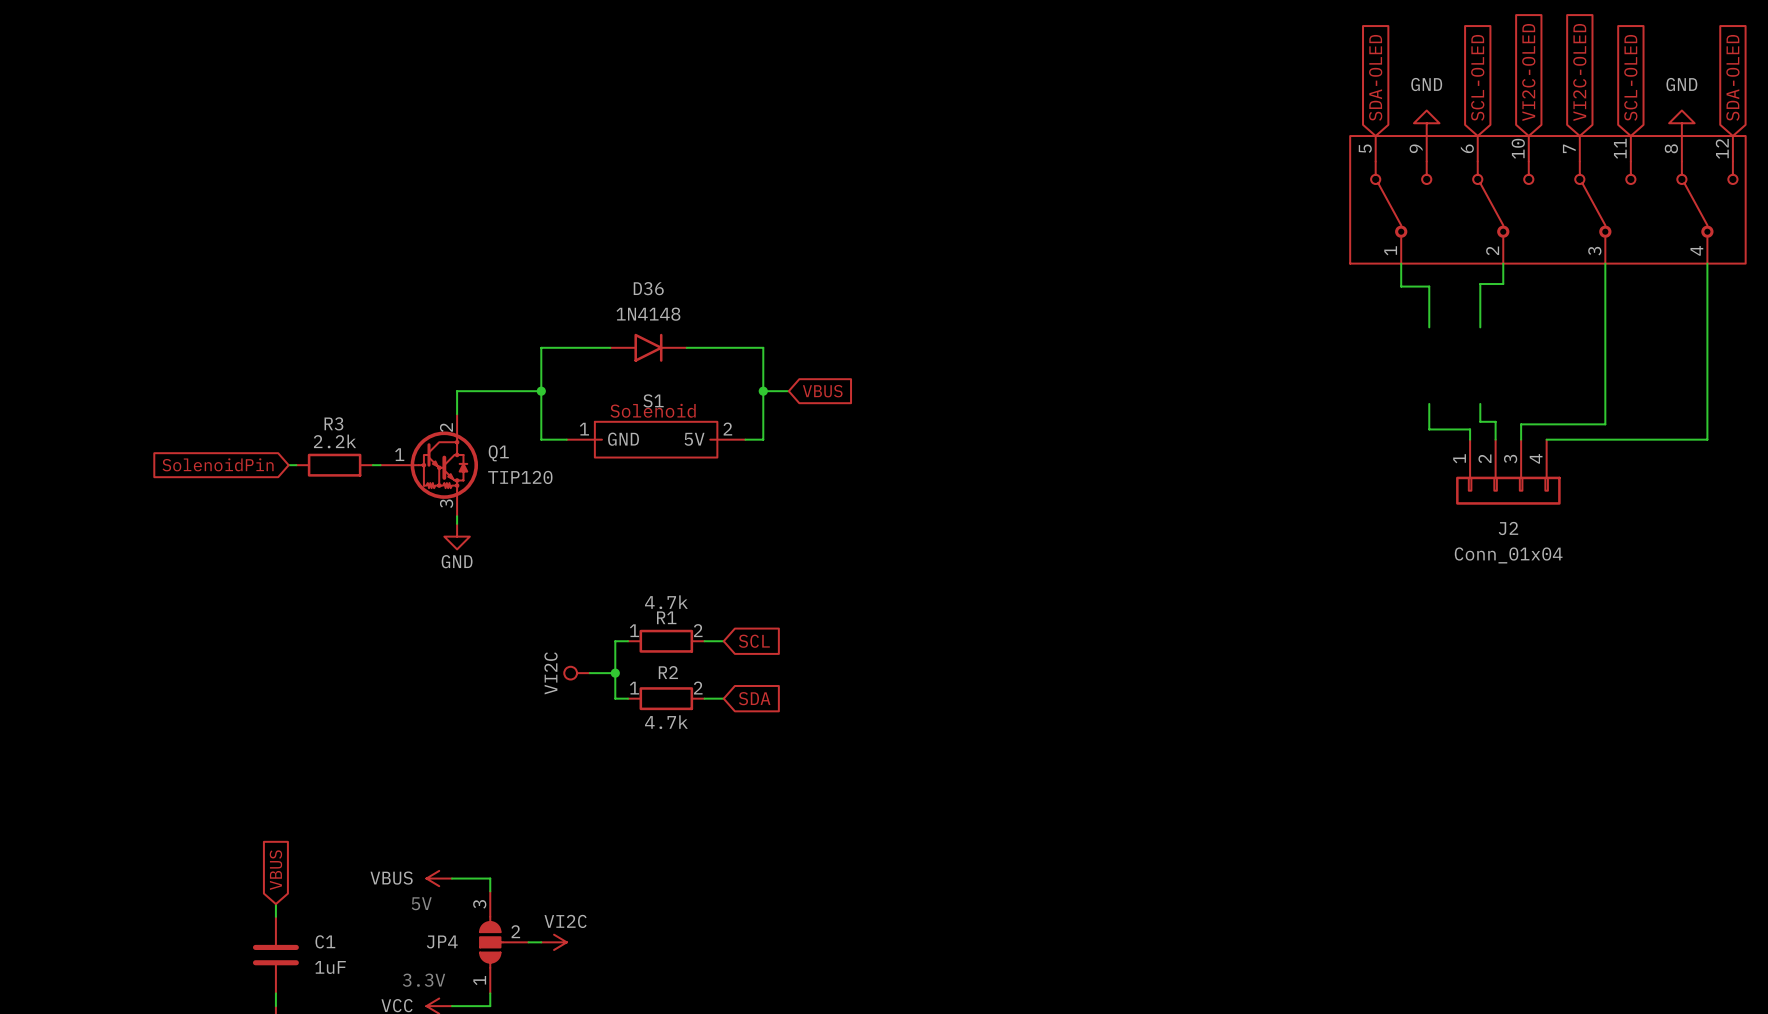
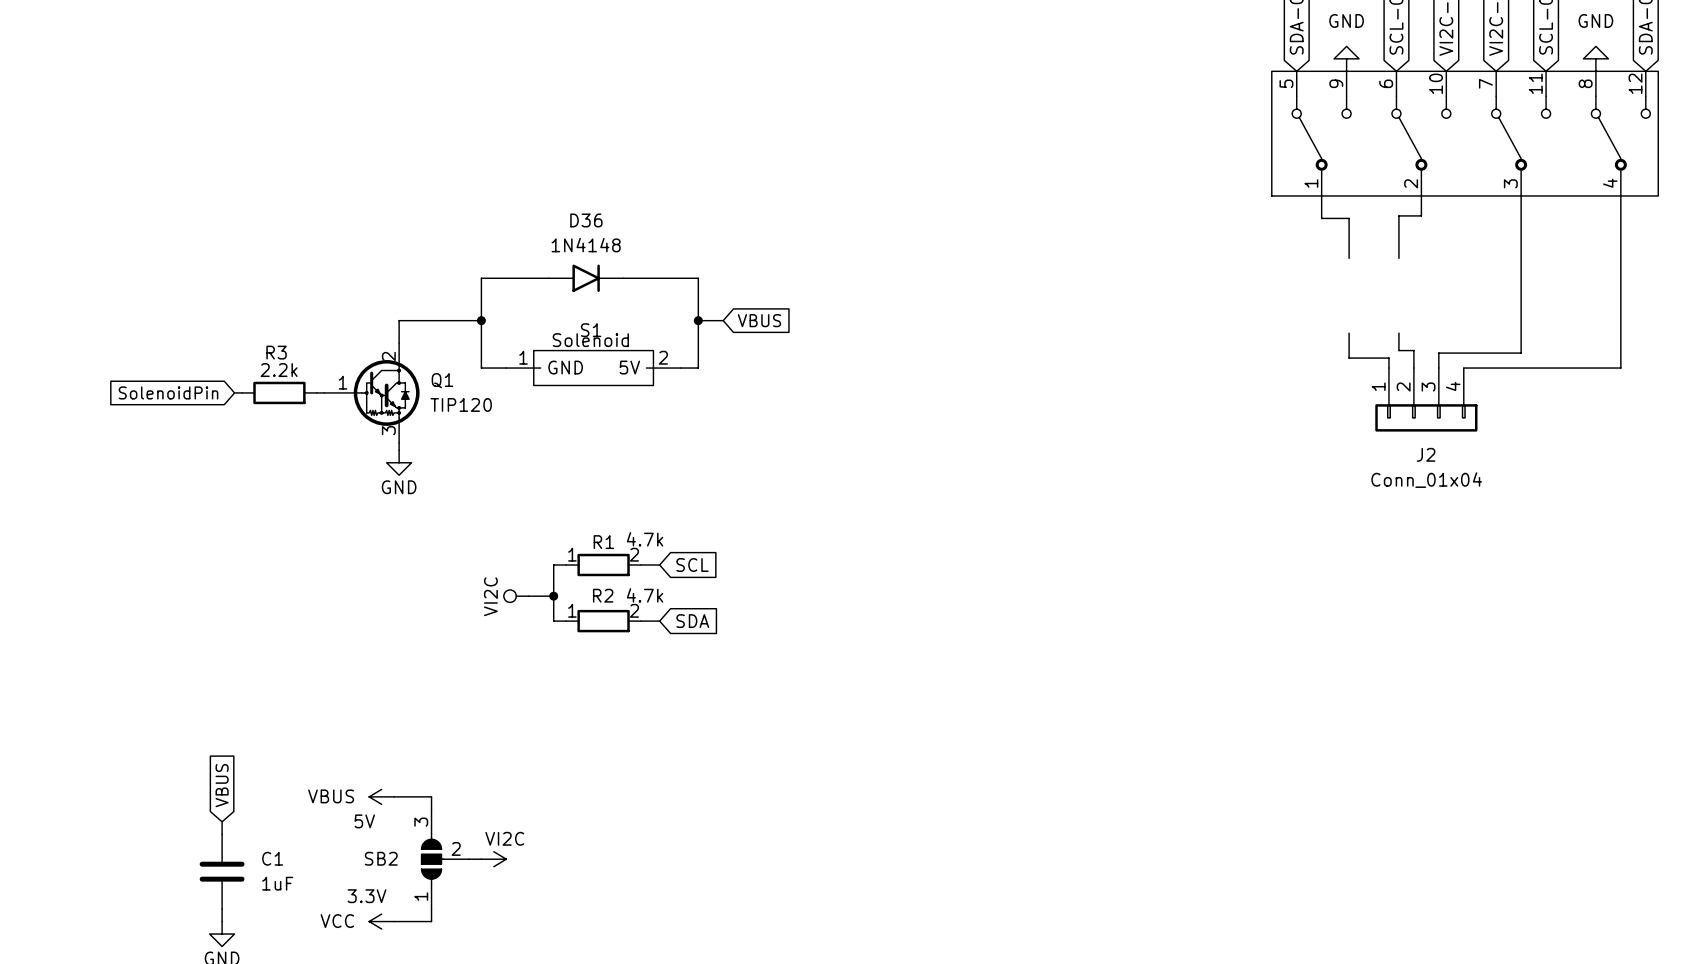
R1 value position: 4.7k (666, 602) -> 4.7k (645, 539)
R2 value position: 4.7k (666, 722) -> 4.7k (645, 595)
JP4 name: JP4 (442, 941) -> SB2 (381, 858)

